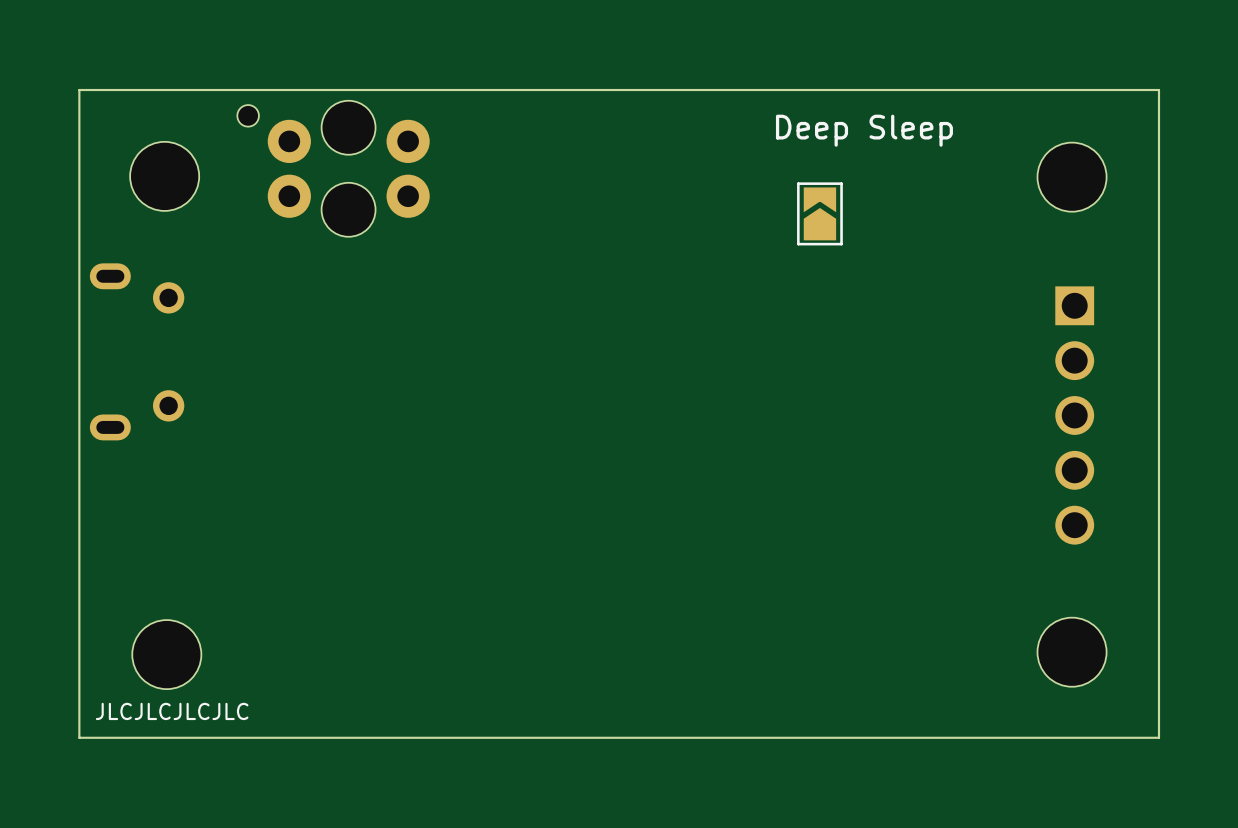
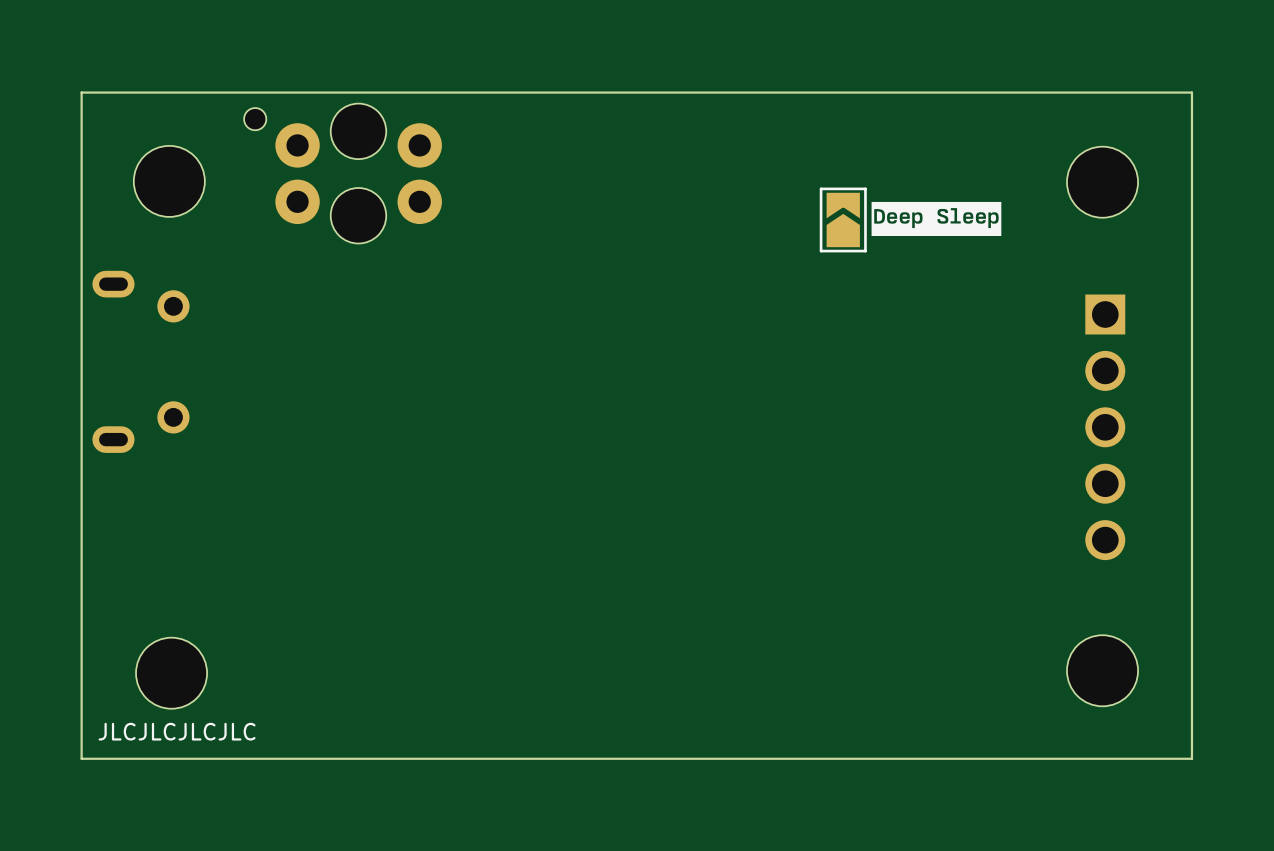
part value: Deep Sleep (864, 130) -> none
drawing: none -> [871, 201, 1002, 236]

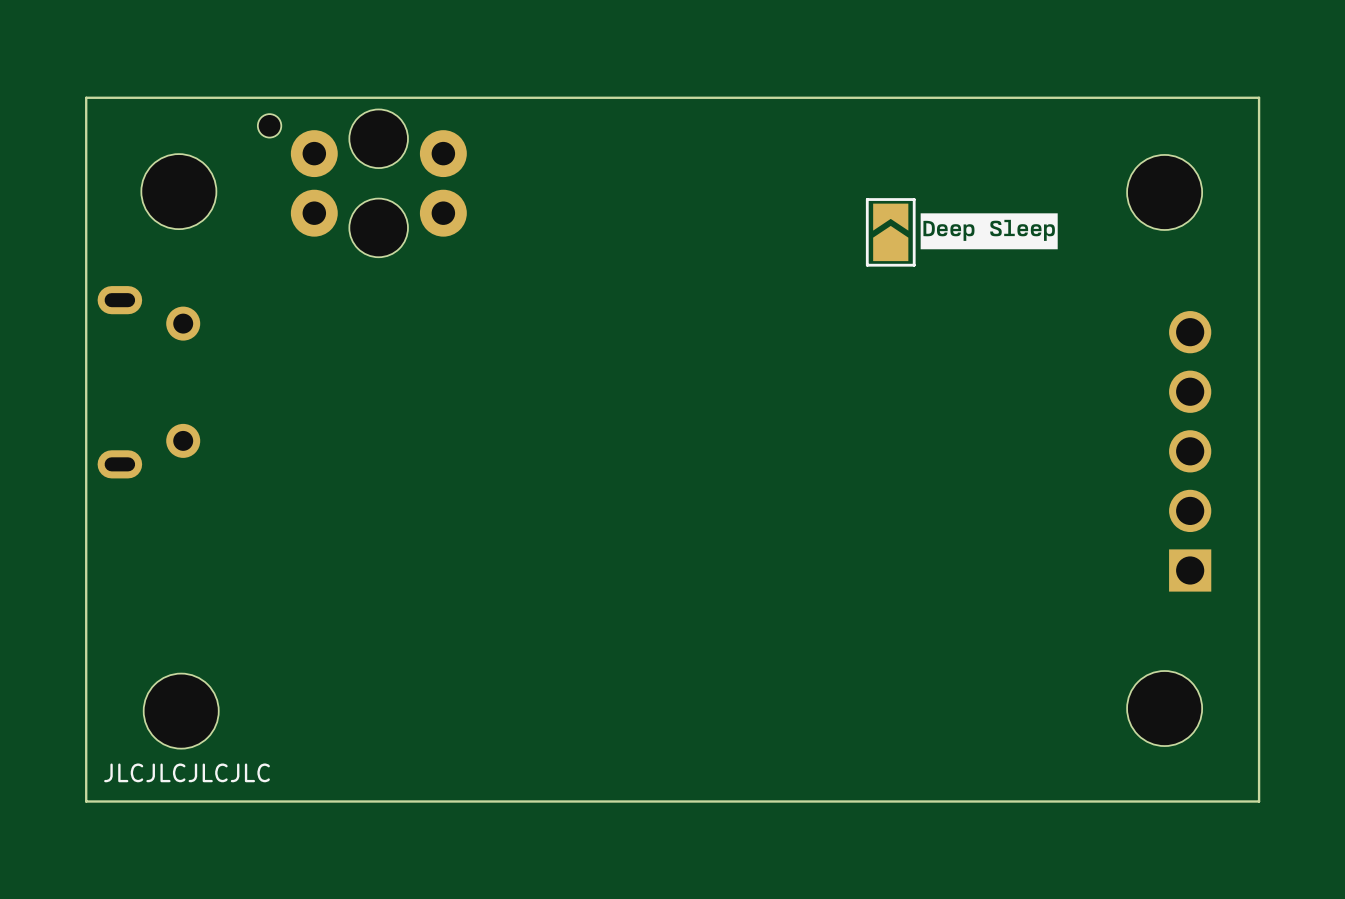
part rotation: 0° (1105, 427) -> 180° (1190, 451)

